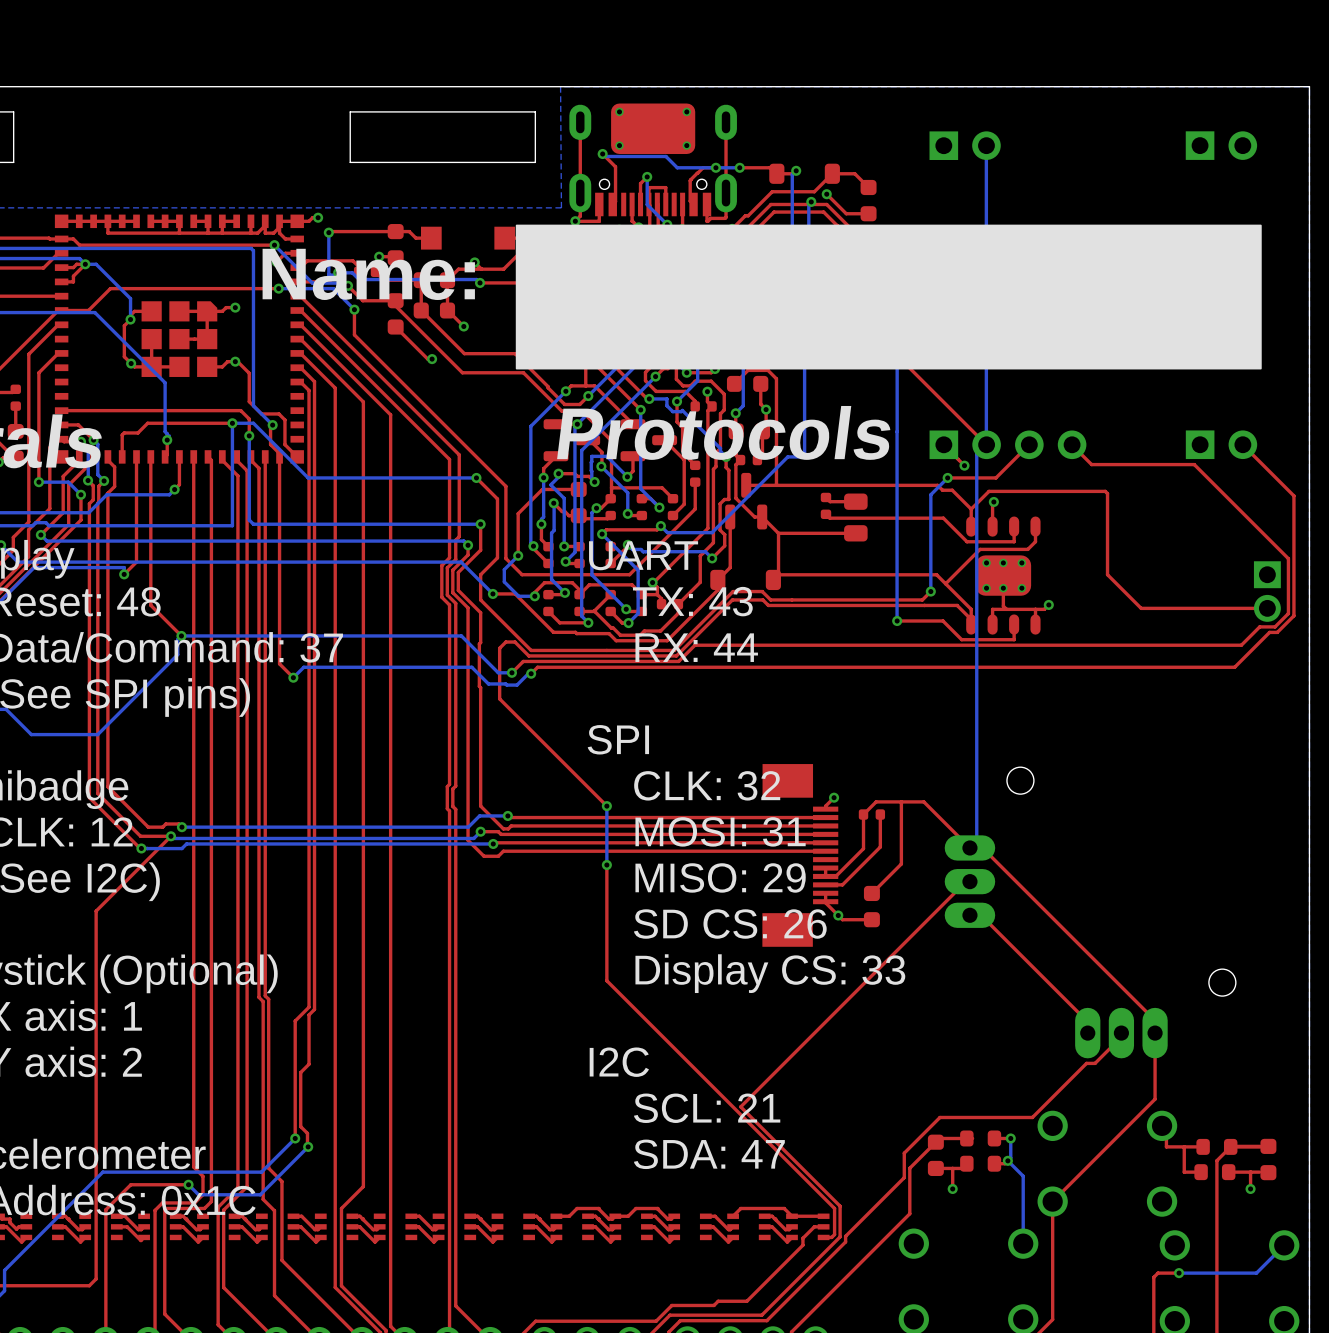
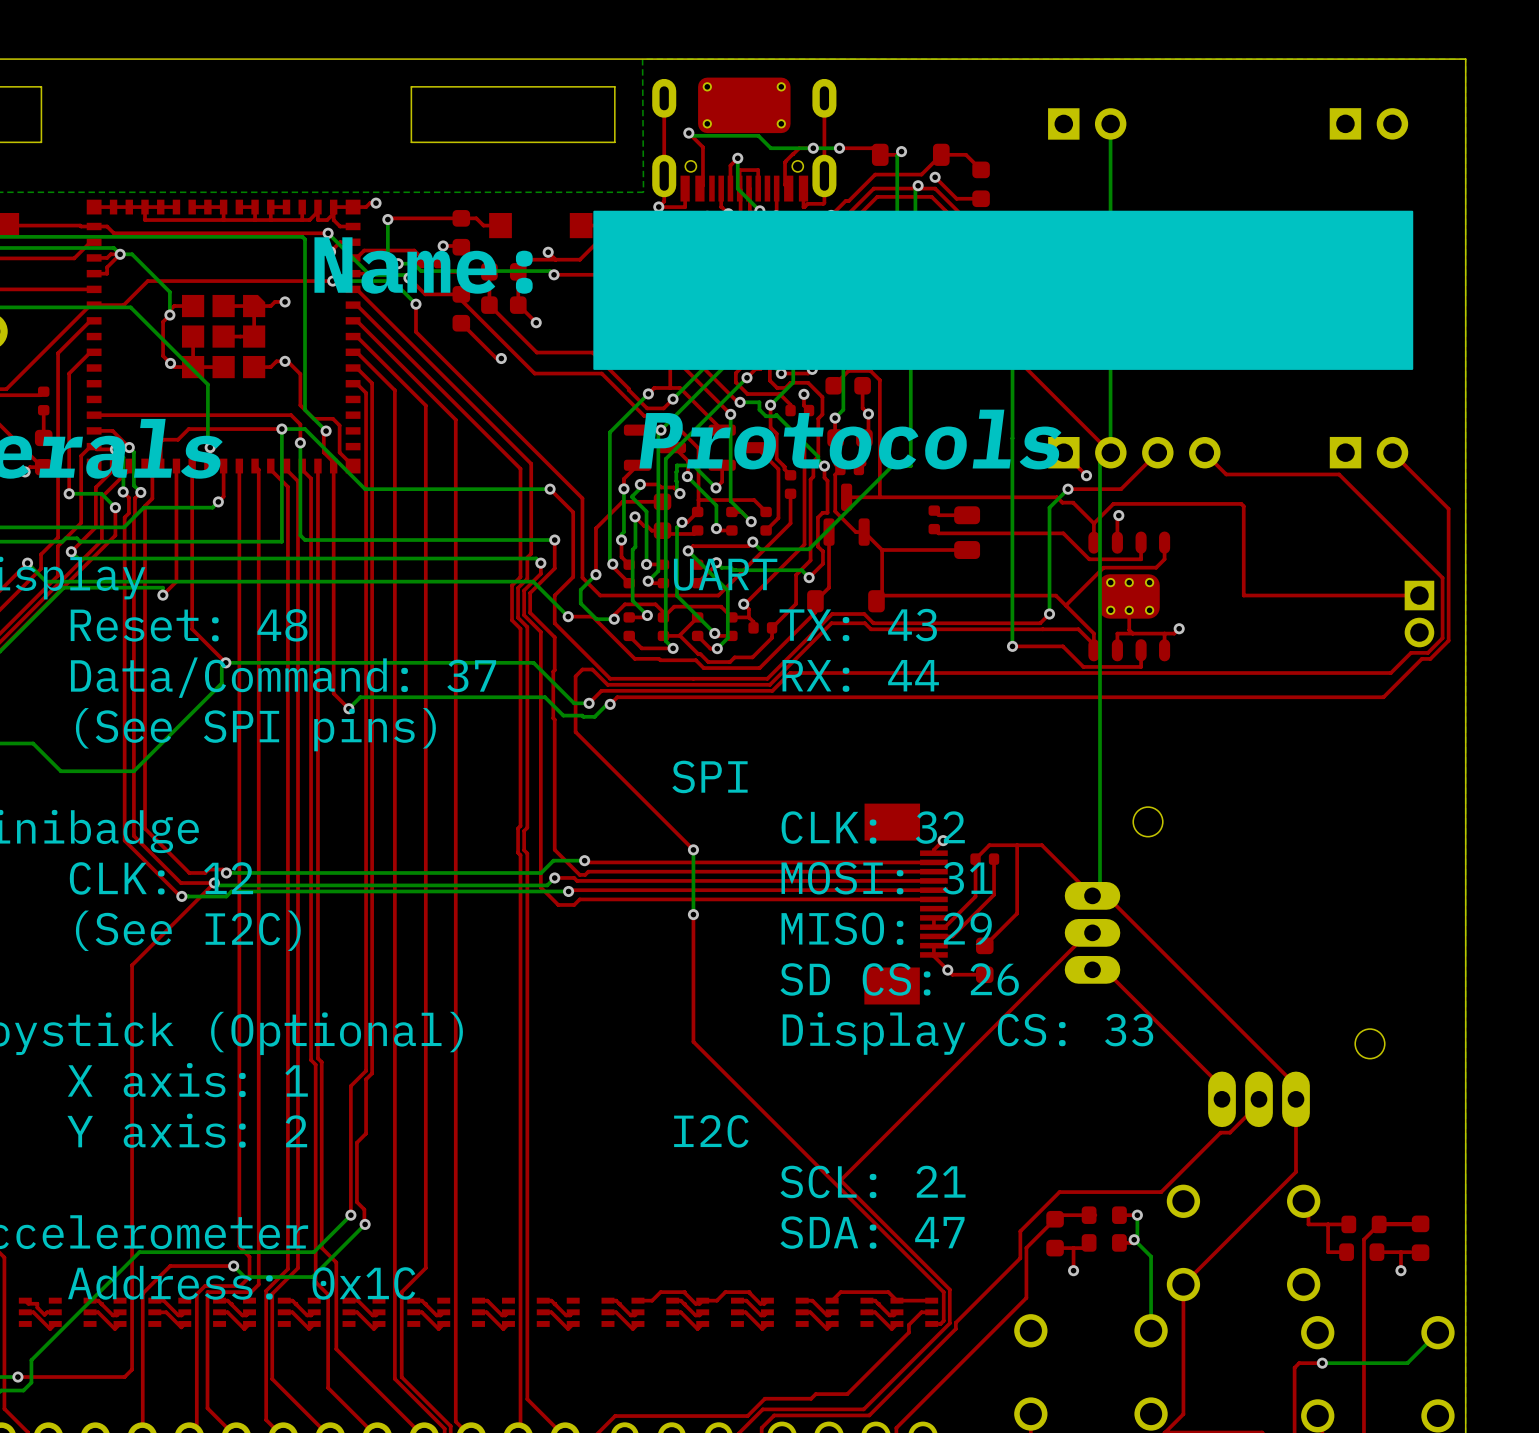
top track: (1107, 574) (1141, 608) (1267, 608) -> (1243, 595) (1419, 595)

